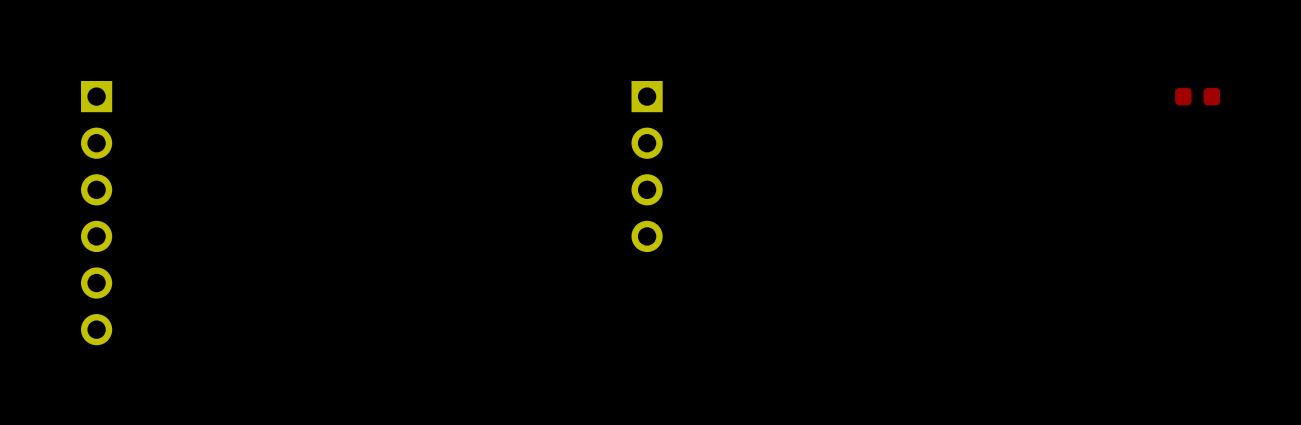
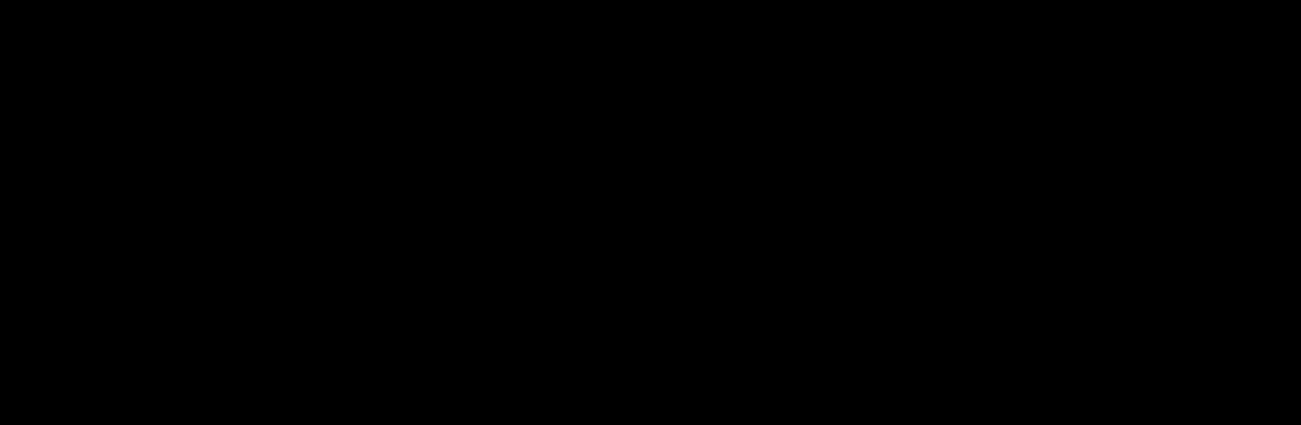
part: (1197, 96) -> none
part: (647, 166) -> none
part: (96, 213) -> none

